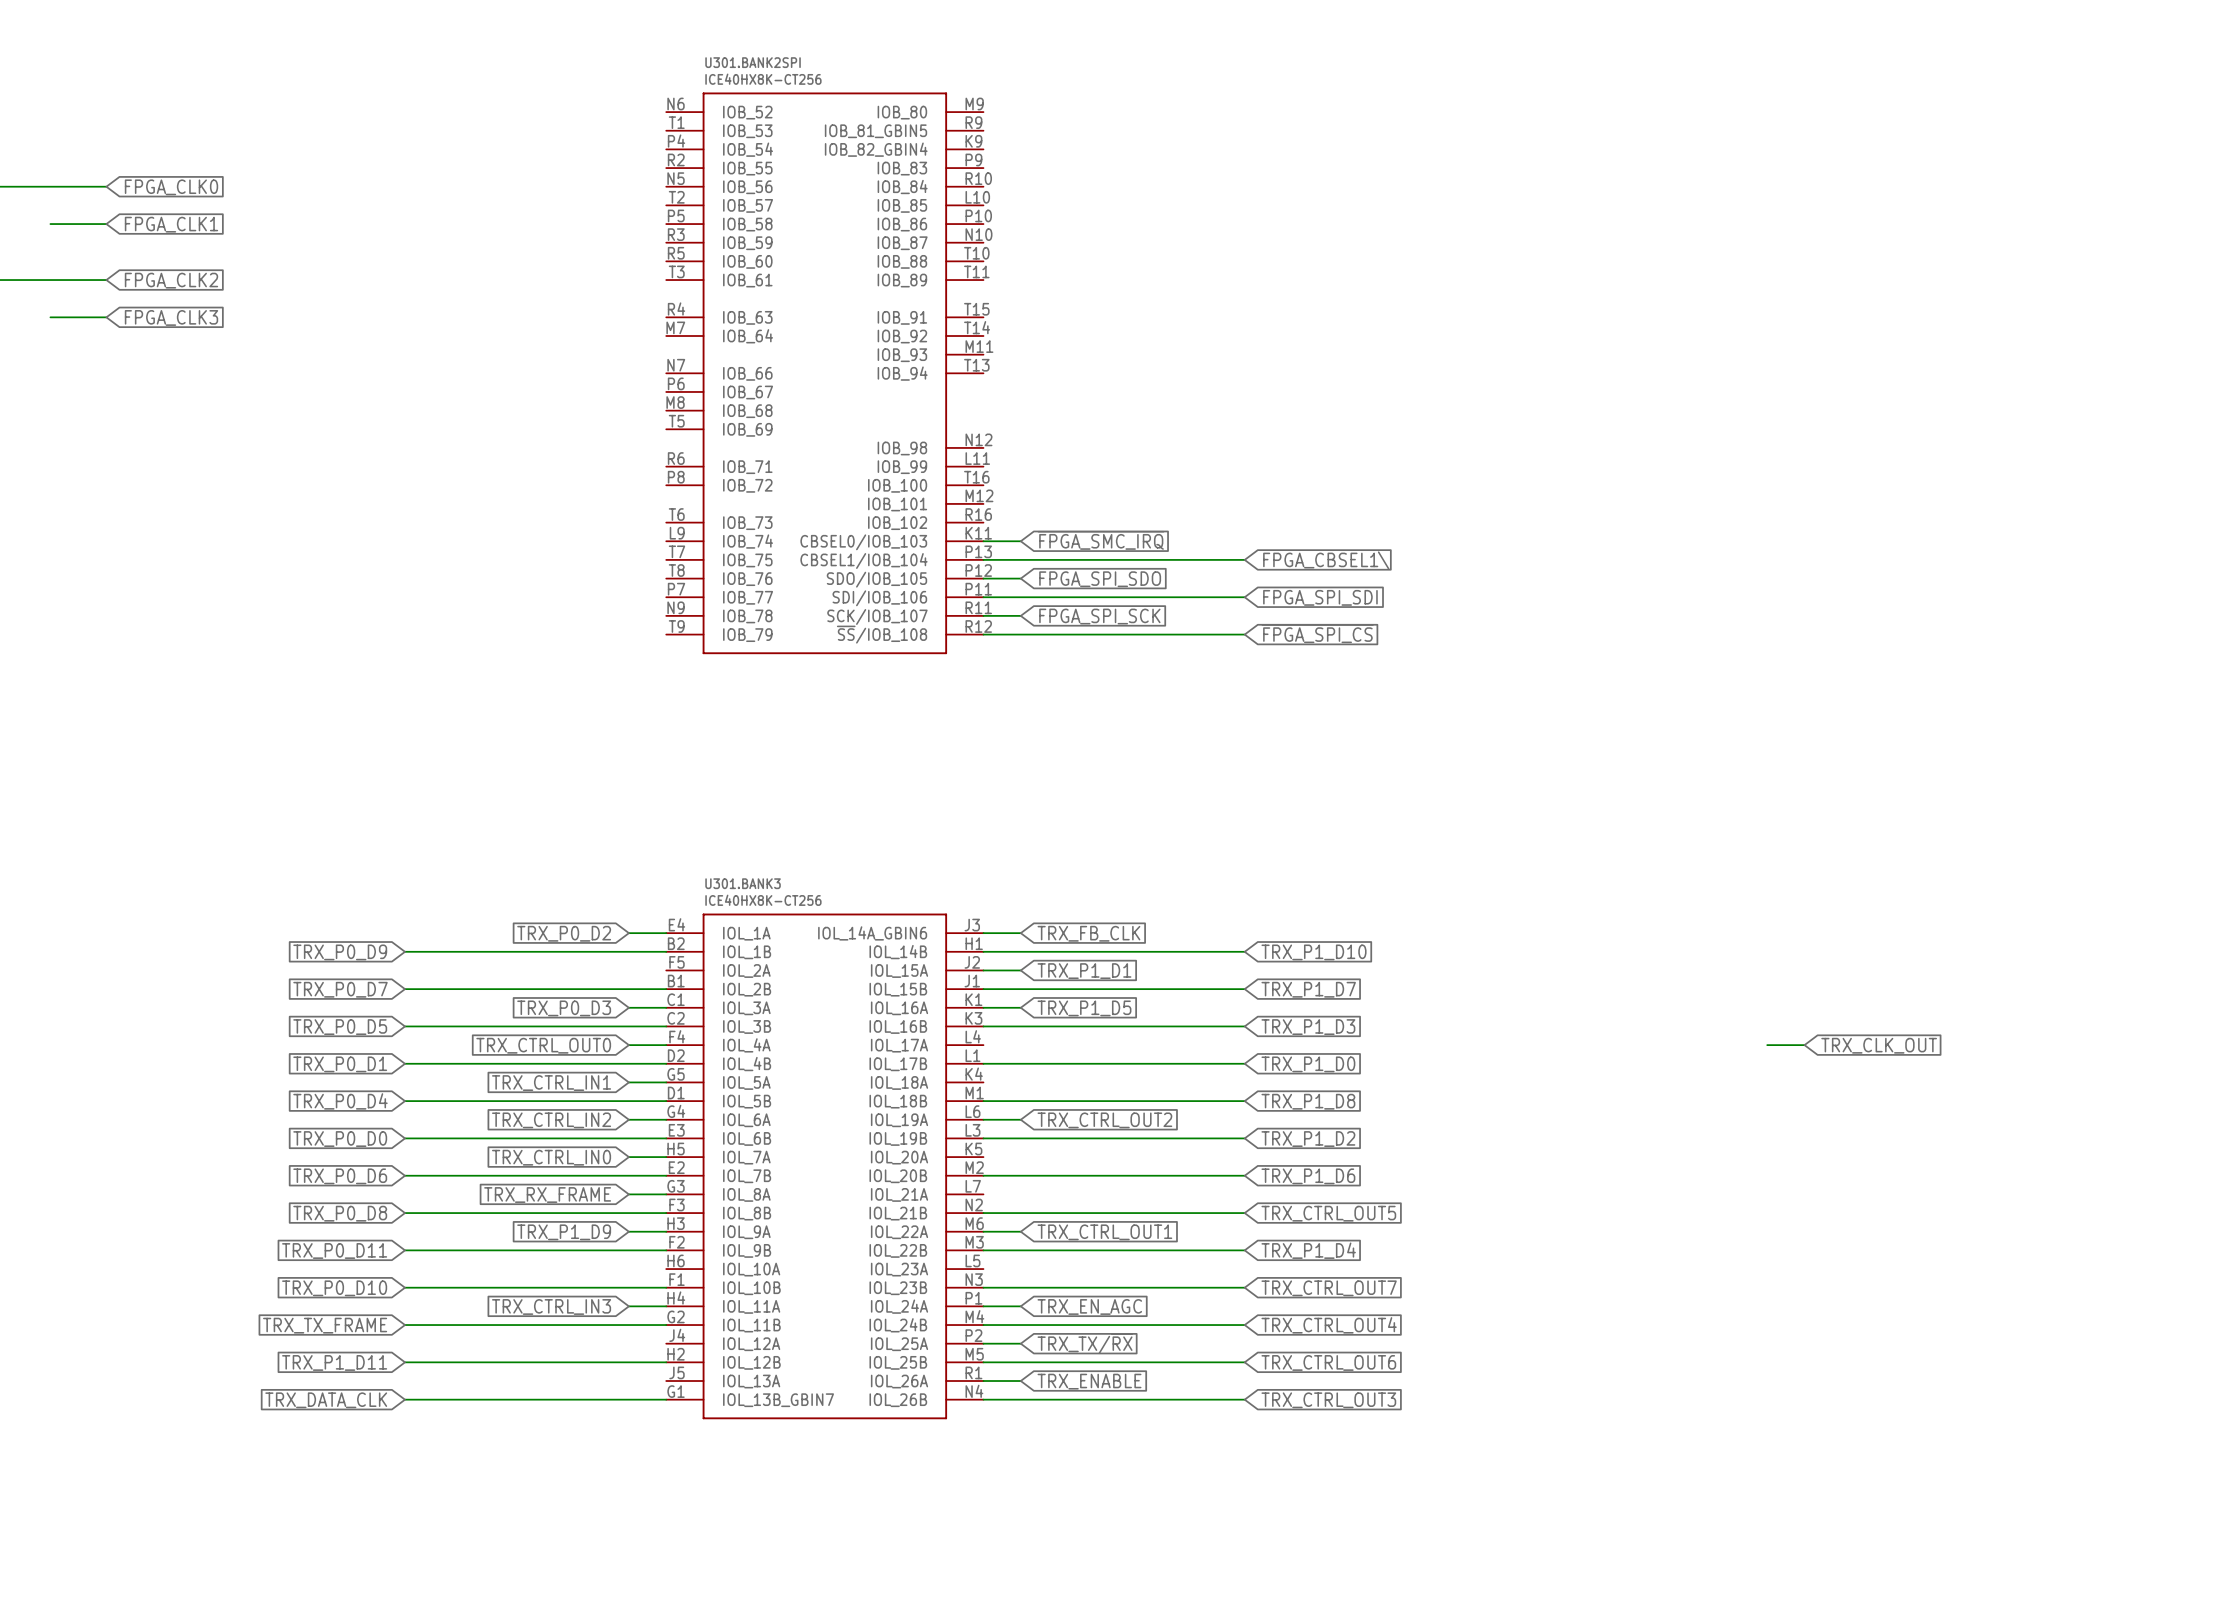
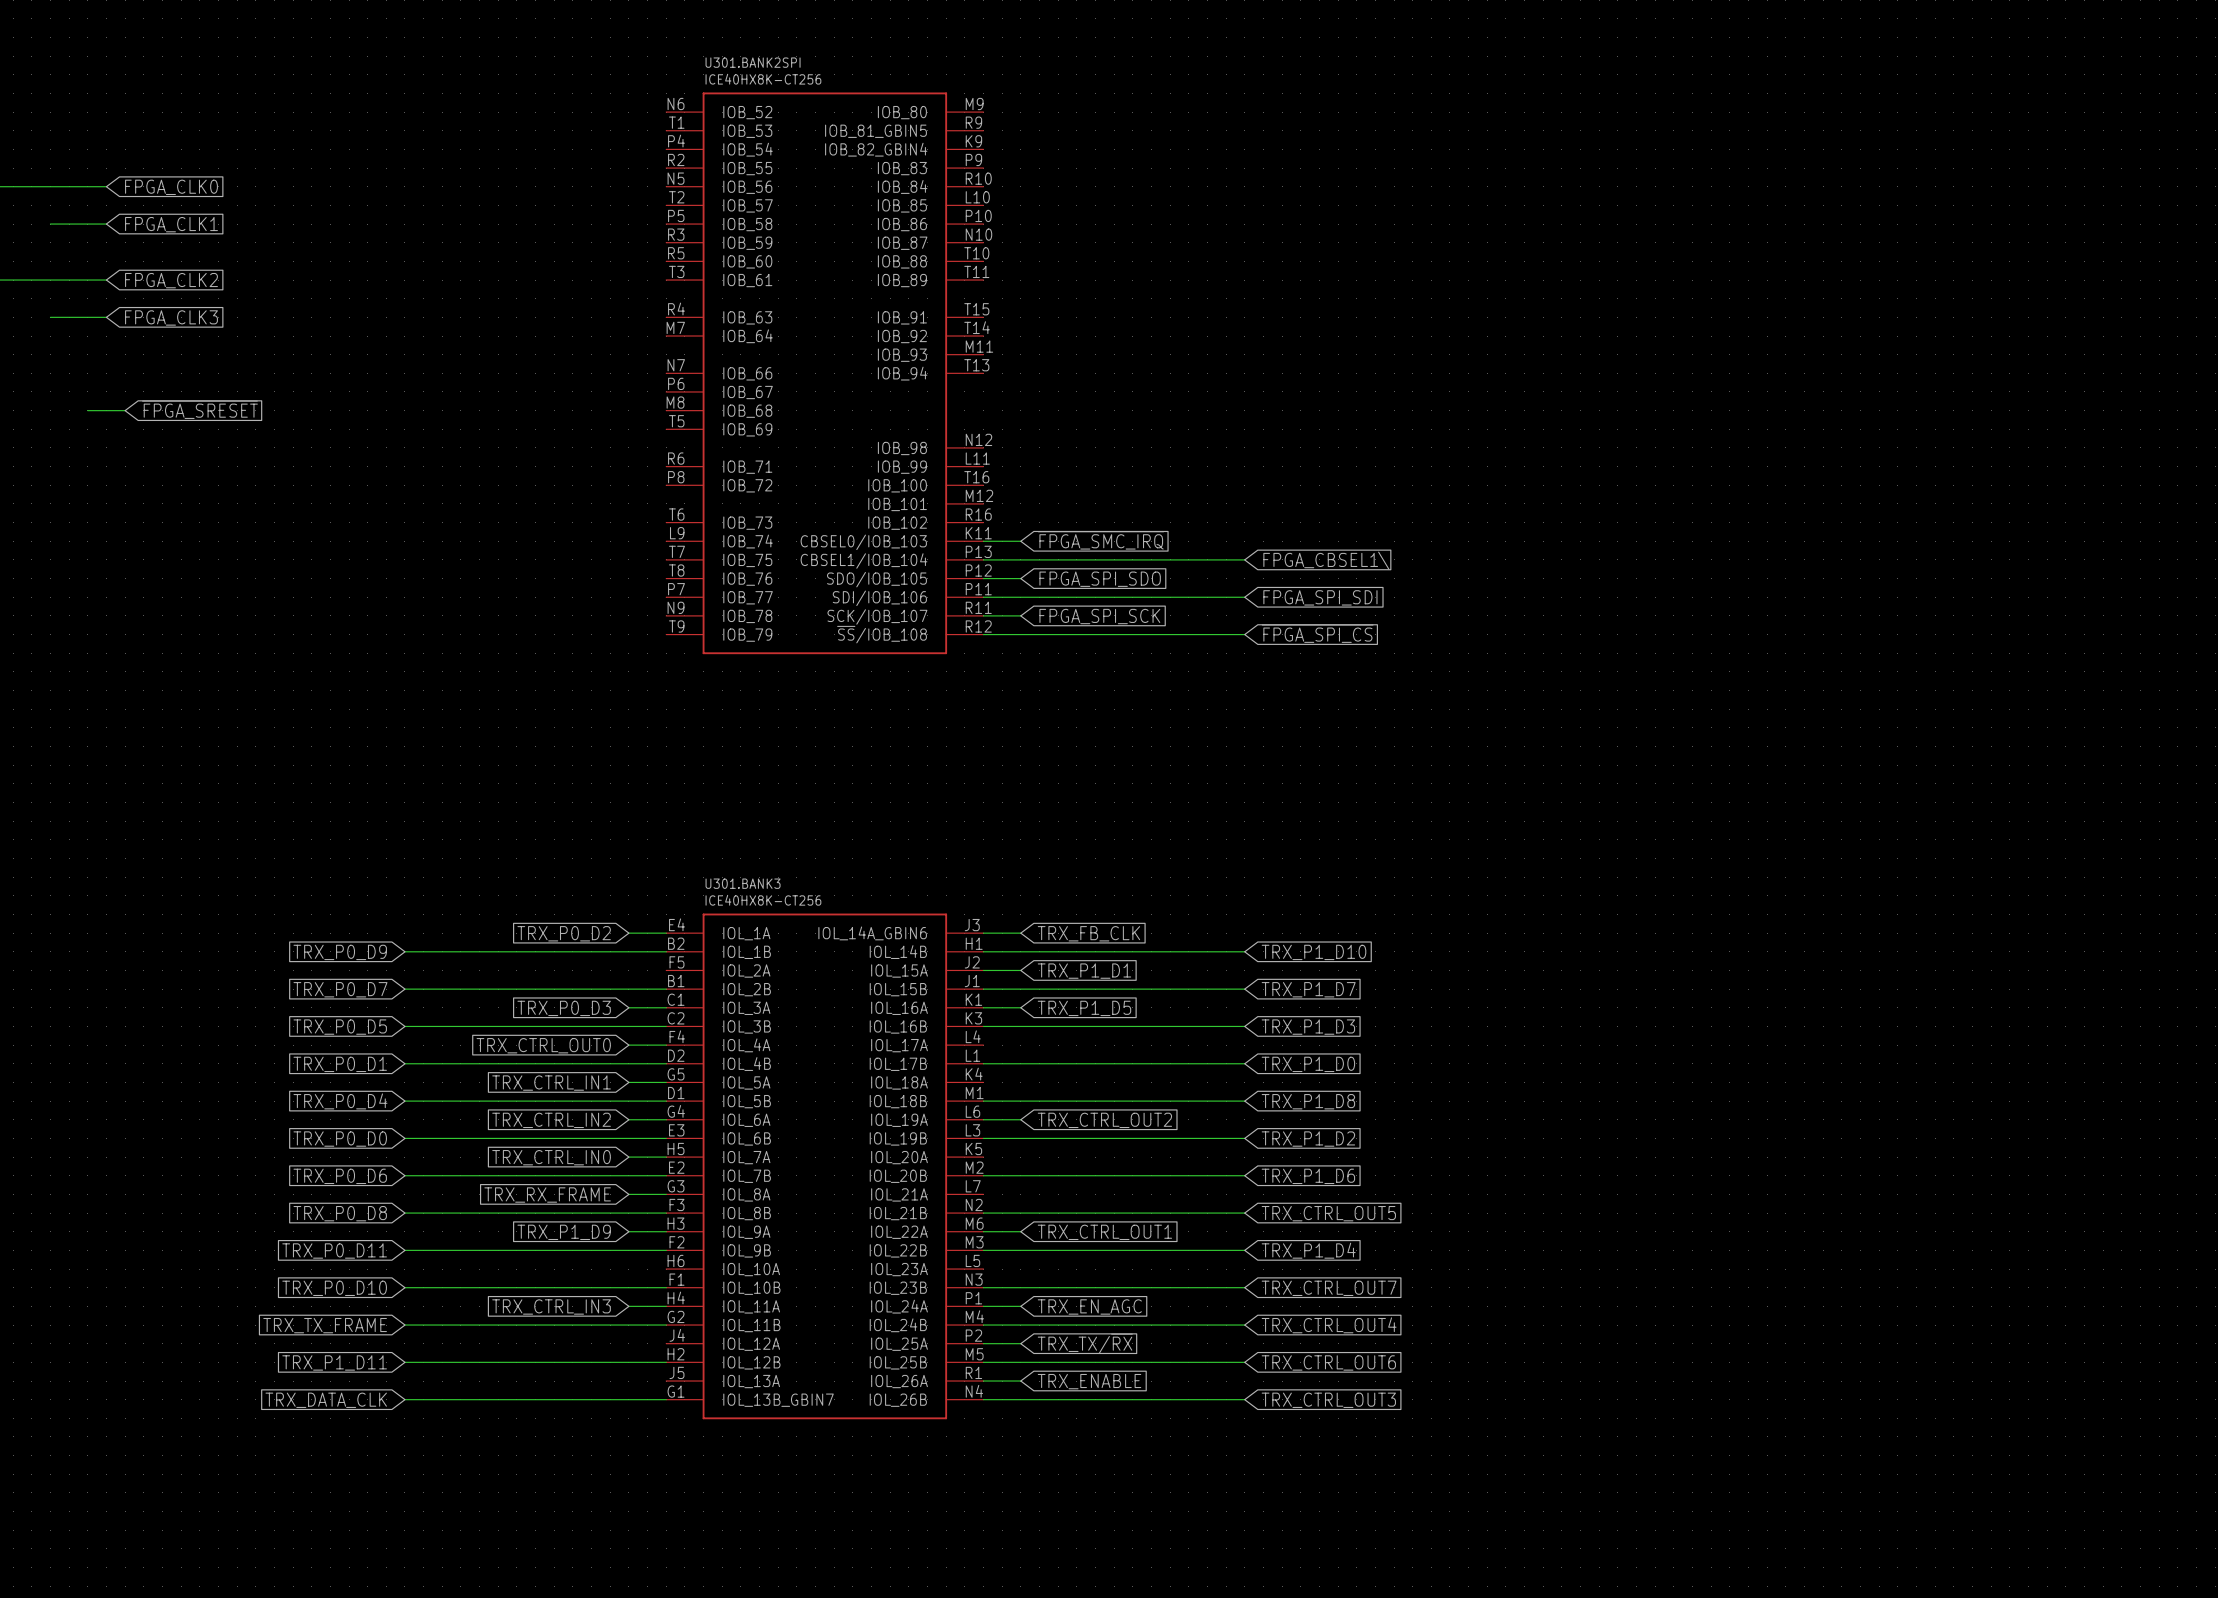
global label: none -> ~{FPGA_SRESET} (199, 409)
wire: none -> (87, 410) (125, 410)
wire: (1767, 1045) (1804, 1045) -> none
global label: TRX_CLK_OUT (1879, 1045) -> none

